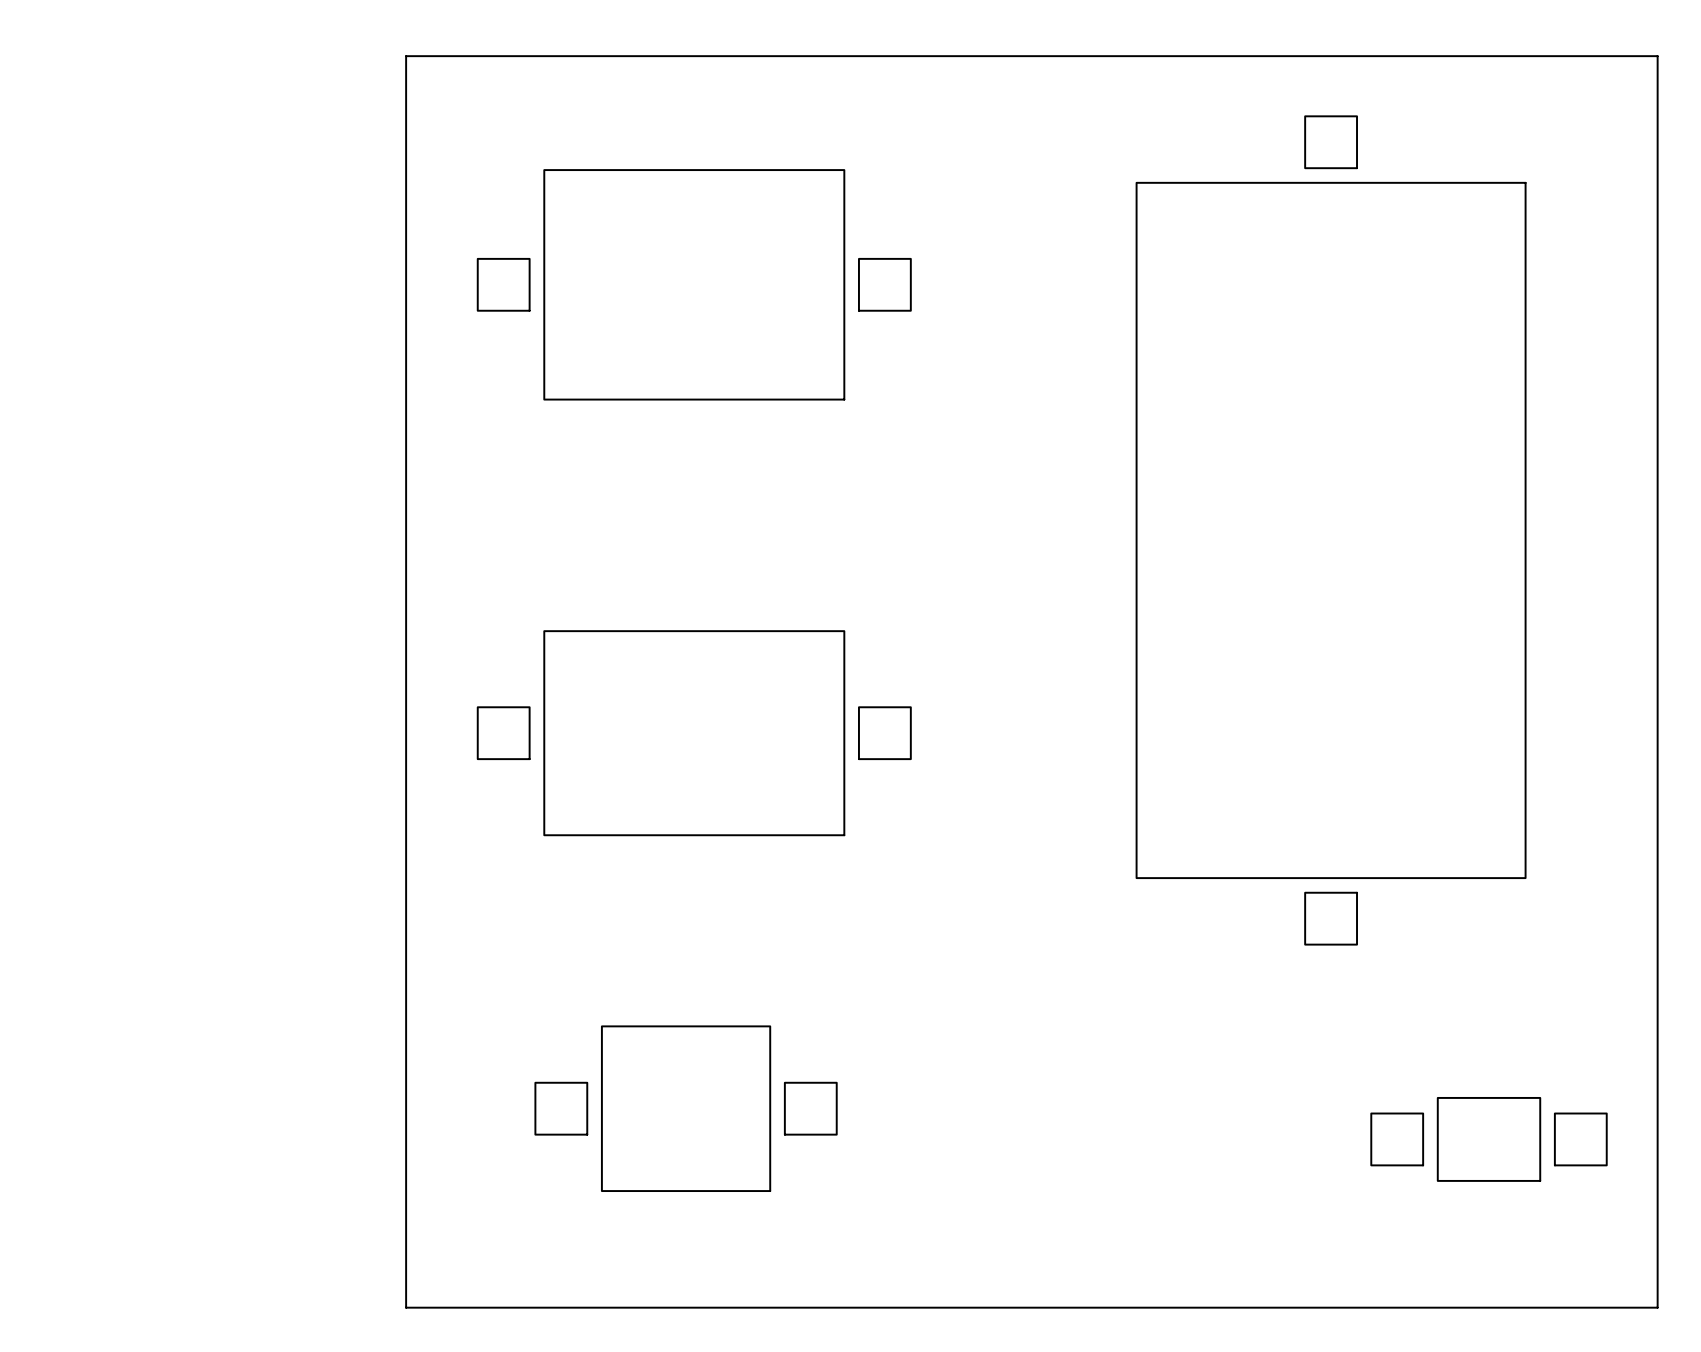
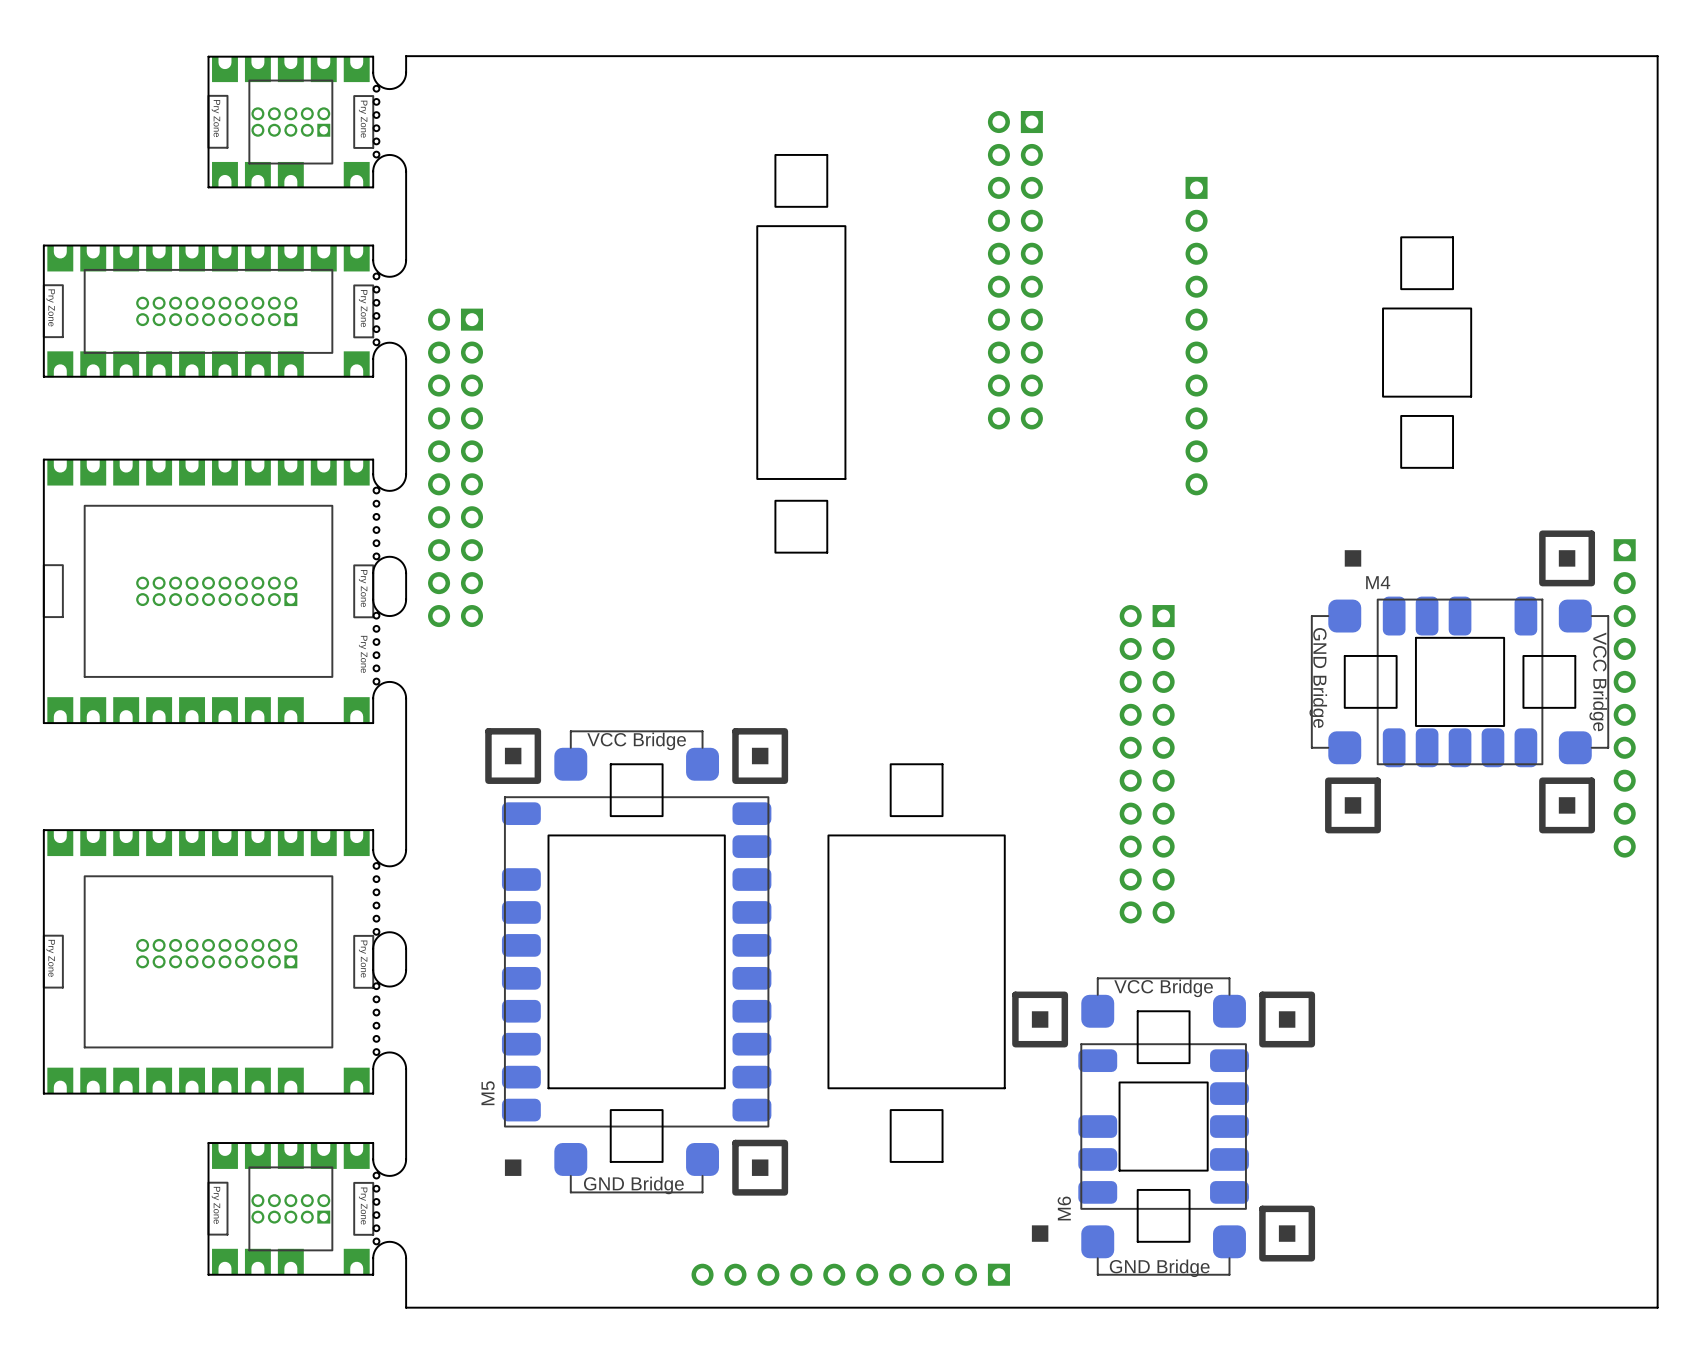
board edge: (406, 72) (406, 171) -> (406, 72) (403, 80) (399, 85) (387, 88) (379, 85) (374, 78) (373, 56) (208, 56) (208, 187) (373, 187) (374, 165) (380, 157) (387, 155) (400, 159) (406, 171)
round board edge: none -> [372, 85, 381, 93]
round board edge: none -> [372, 98, 381, 106]
round board edge: none -> [372, 111, 381, 119]
part: none -> (290, 122)
part: none -> (290, 122)
round board edge: none -> [372, 124, 381, 132]
round board edge: none -> [372, 137, 381, 145]
round board edge: none -> [372, 151, 381, 159]
board edge: (406, 260) (406, 359) -> (406, 260) (401, 271) (389, 276) (381, 274) (375, 268) (373, 245) (43, 245) (43, 376) (373, 376) (375, 351) (380, 345) (389, 342) (401, 348) (406, 359)
part: none -> (1015, 270)
round board edge: none -> [372, 272, 381, 281]
part: (694, 284) -> none
round board edge: none -> [372, 286, 381, 294]
round board edge: none -> [372, 299, 381, 307]
part: none -> (208, 311)
part: none -> (216, 311)
round board edge: none -> [372, 312, 381, 320]
round board edge: none -> [372, 325, 381, 333]
part: none -> (1196, 336)
round board edge: none -> [372, 338, 381, 346]
part: none -> (1427, 352)
part: none -> (801, 353)
part: none -> (455, 467)
board edge: (406, 474) (406, 573) -> (406, 474) (401, 486) (389, 490) (381, 488) (375, 482) (373, 459) (43, 459) (43, 723) (373, 723) (373, 694) (380, 684) (387, 682) (397, 683) (404, 690) (406, 698)
round board edge: none -> [372, 486, 381, 495]
round board edge: none -> [372, 500, 381, 508]
round board edge: none -> [372, 513, 381, 521]
round board edge: none -> [372, 526, 381, 534]
part: (1331, 530) -> none
round board edge: none -> [372, 539, 381, 547]
round board edge: none -> [372, 552, 381, 560]
part: none -> (208, 591)
part: none -> (216, 591)
board edge: (406, 599) (406, 698) -> (406, 599) (401, 611) (389, 616) (378, 611) (373, 599) (373, 571) (379, 560) (387, 556) (397, 558) (403, 565) (406, 573)
round board edge: none -> [372, 612, 381, 620]
round board edge: none -> [372, 625, 381, 633]
round board edge: none -> [372, 638, 381, 646]
round board edge: none -> [372, 651, 381, 659]
round board edge: none -> [372, 664, 381, 672]
round board edge: none -> [372, 677, 381, 686]
M4: none -> (1460, 681)
part: none -> (1624, 698)
part: (694, 733) -> none
part: none -> (1147, 764)
board edge: (406, 849) (406, 948) -> (406, 849) (403, 858) (397, 864) (389, 866) (381, 864) (373, 854) (373, 830) (43, 830) (43, 1093) (373, 1093) (373, 1064) (380, 1055) (387, 1052) (397, 1054) (403, 1059) (406, 1068)
round board edge: none -> [372, 862, 381, 870]
round board edge: none -> [372, 875, 381, 883]
round board edge: none -> [372, 888, 381, 896]
round board edge: none -> [372, 901, 381, 910]
round board edge: none -> [372, 915, 381, 923]
round board edge: none -> [372, 928, 381, 936]
part: none -> (216, 953)
part: none -> (208, 961)
M5: none -> (636, 961)
part: none -> (916, 963)
board edge: (406, 970) (406, 1068) -> (406, 970) (401, 981) (389, 986) (378, 981) (373, 970) (373, 944) (380, 935) (389, 932) (397, 934) (404, 941) (406, 948)
round board edge: none -> [372, 982, 381, 990]
round board edge: none -> [372, 995, 381, 1003]
round board edge: none -> [372, 1008, 381, 1017]
round board edge: none -> [372, 1022, 381, 1030]
round board edge: none -> [372, 1035, 381, 1043]
round board edge: none -> [372, 1048, 381, 1056]
part: (686, 1108) -> none
M6: none -> (1163, 1126)
part: (1489, 1139) -> none
board edge: (406, 1159) (406, 1258) -> (406, 1159) (403, 1167) (399, 1172) (387, 1175) (379, 1172) (374, 1165) (373, 1143) (208, 1143) (208, 1274) (373, 1274) (374, 1251) (379, 1245) (387, 1241) (395, 1243) (401, 1246) (406, 1258)
round board edge: none -> [372, 1171, 381, 1180]
round board edge: none -> [372, 1185, 381, 1193]
round board edge: none -> [372, 1198, 381, 1206]
part: none -> (290, 1208)
part: none -> (290, 1208)
round board edge: none -> [372, 1211, 381, 1219]
round board edge: none -> [372, 1224, 381, 1232]
round board edge: none -> [372, 1237, 381, 1245]
part: none -> (850, 1274)

